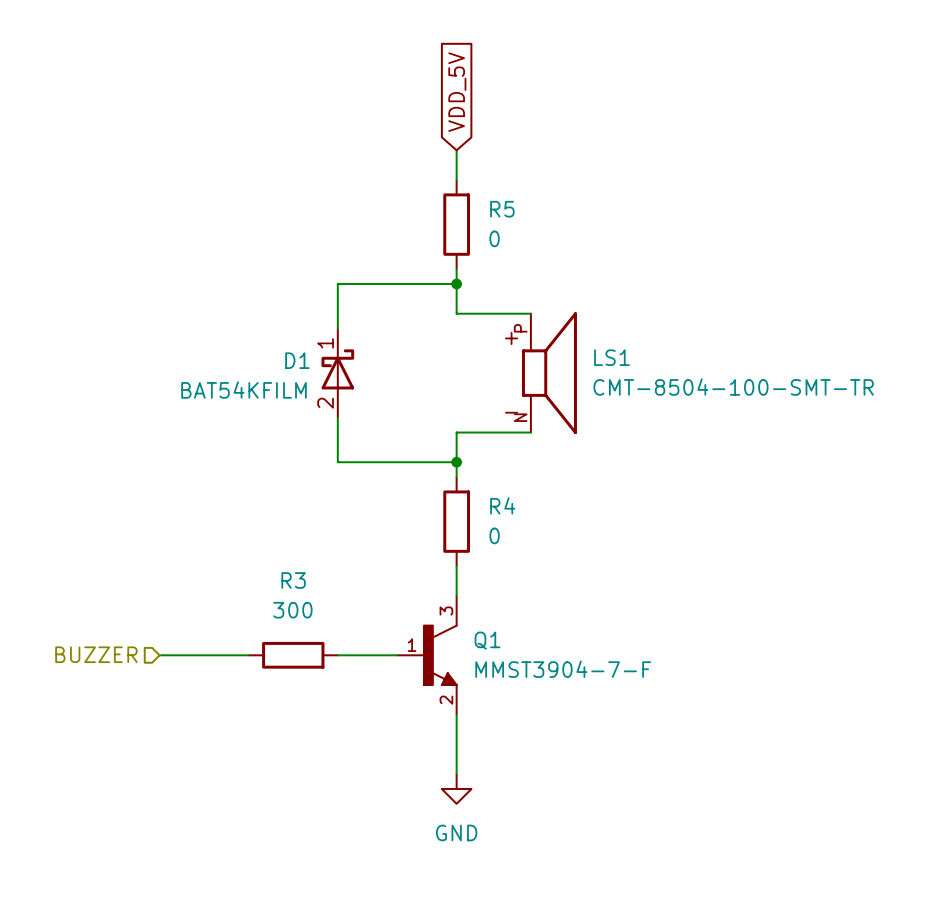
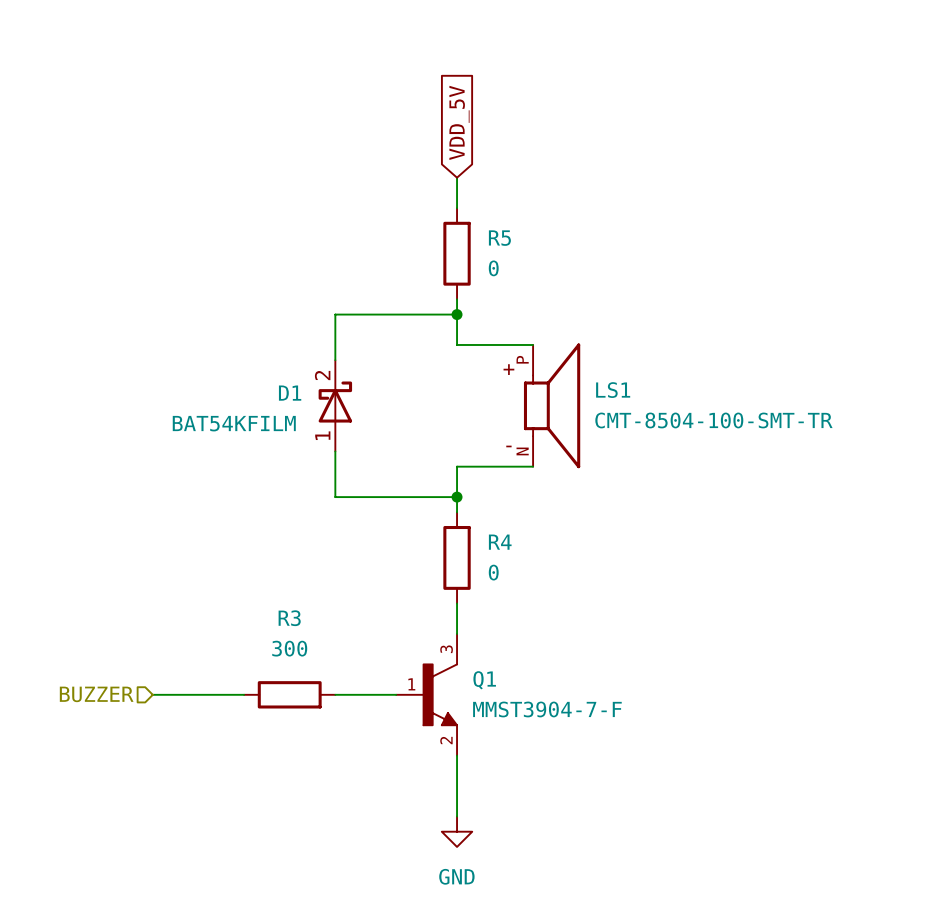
D1 pin number: 1 (325, 343) -> 2 (322, 375)
D1 pin number: 2 (325, 403) -> 1 (322, 435)

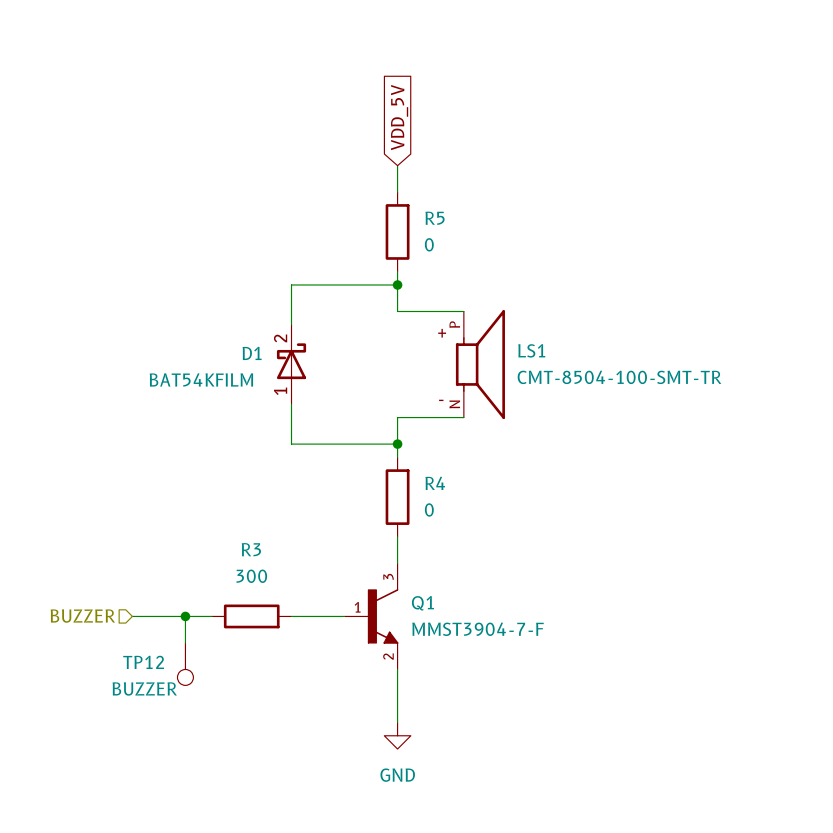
wire: none -> (185, 616) (185, 642)
junction: none -> (185, 616)
TP12: none -> BUZZER (185, 664)

